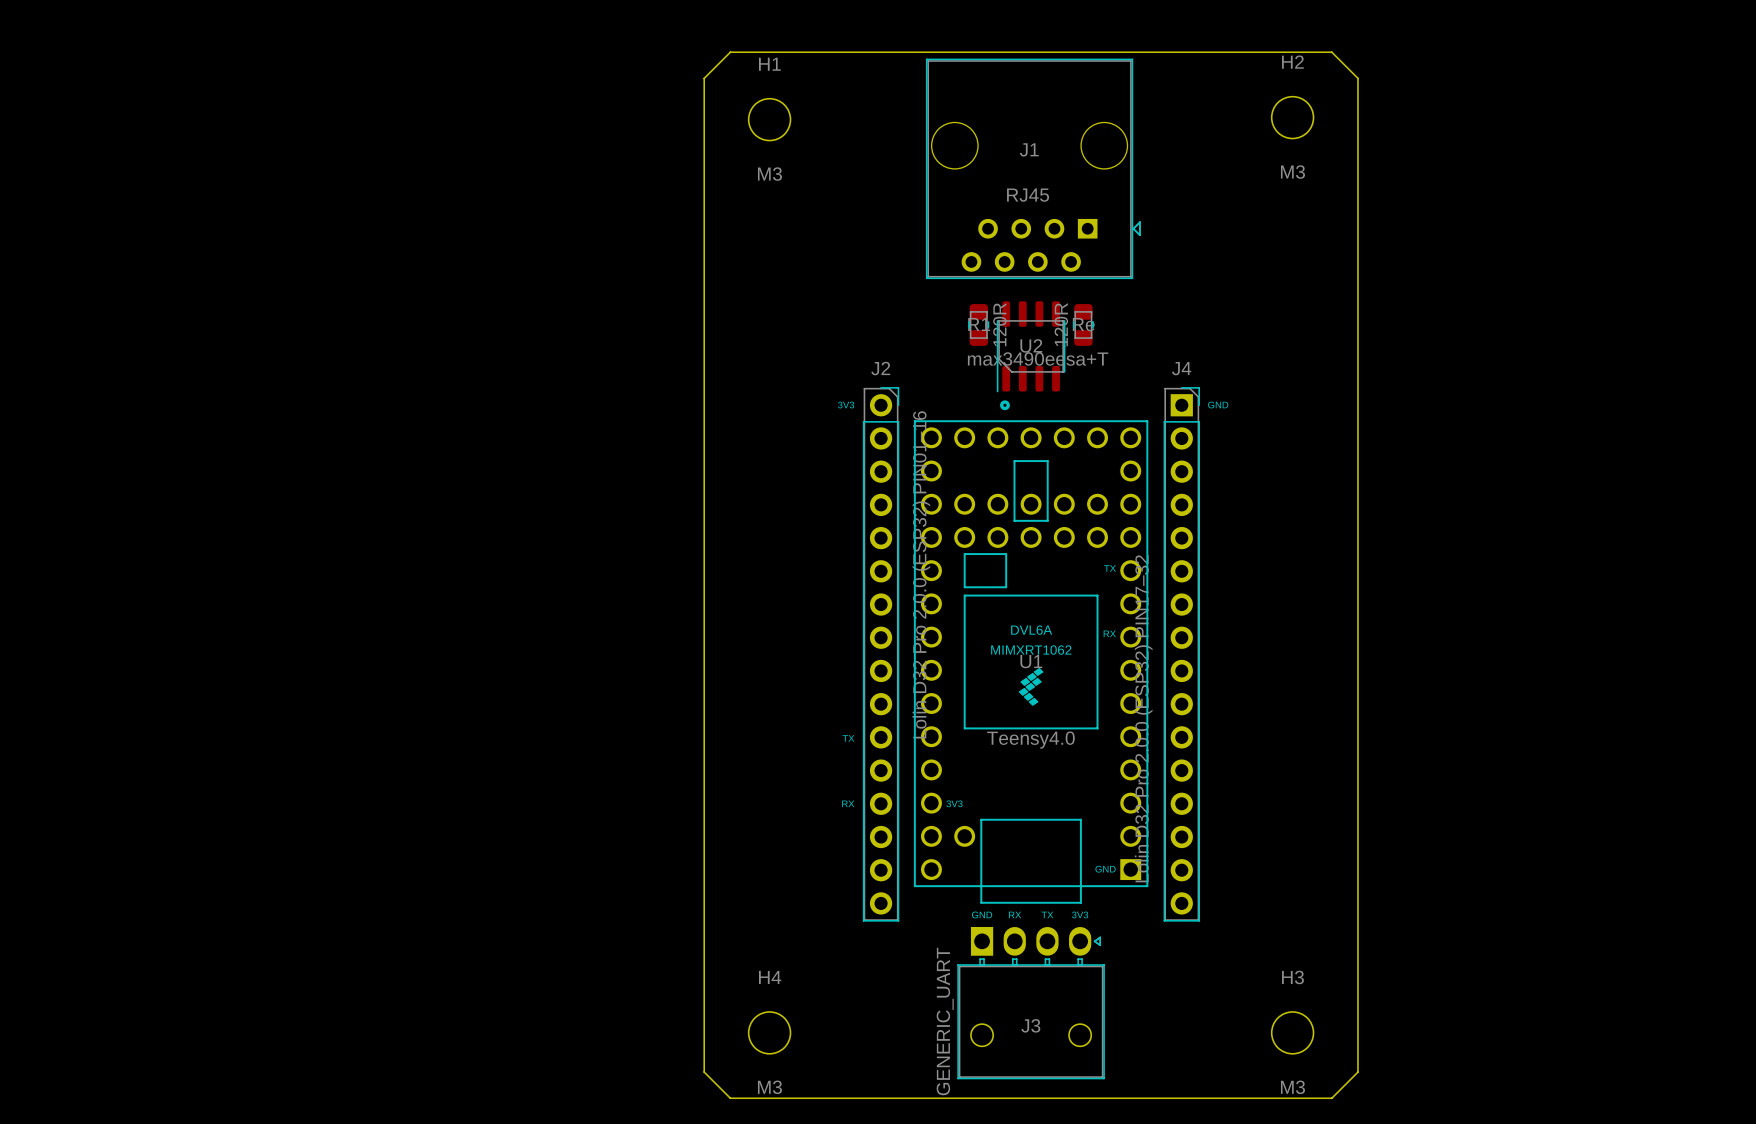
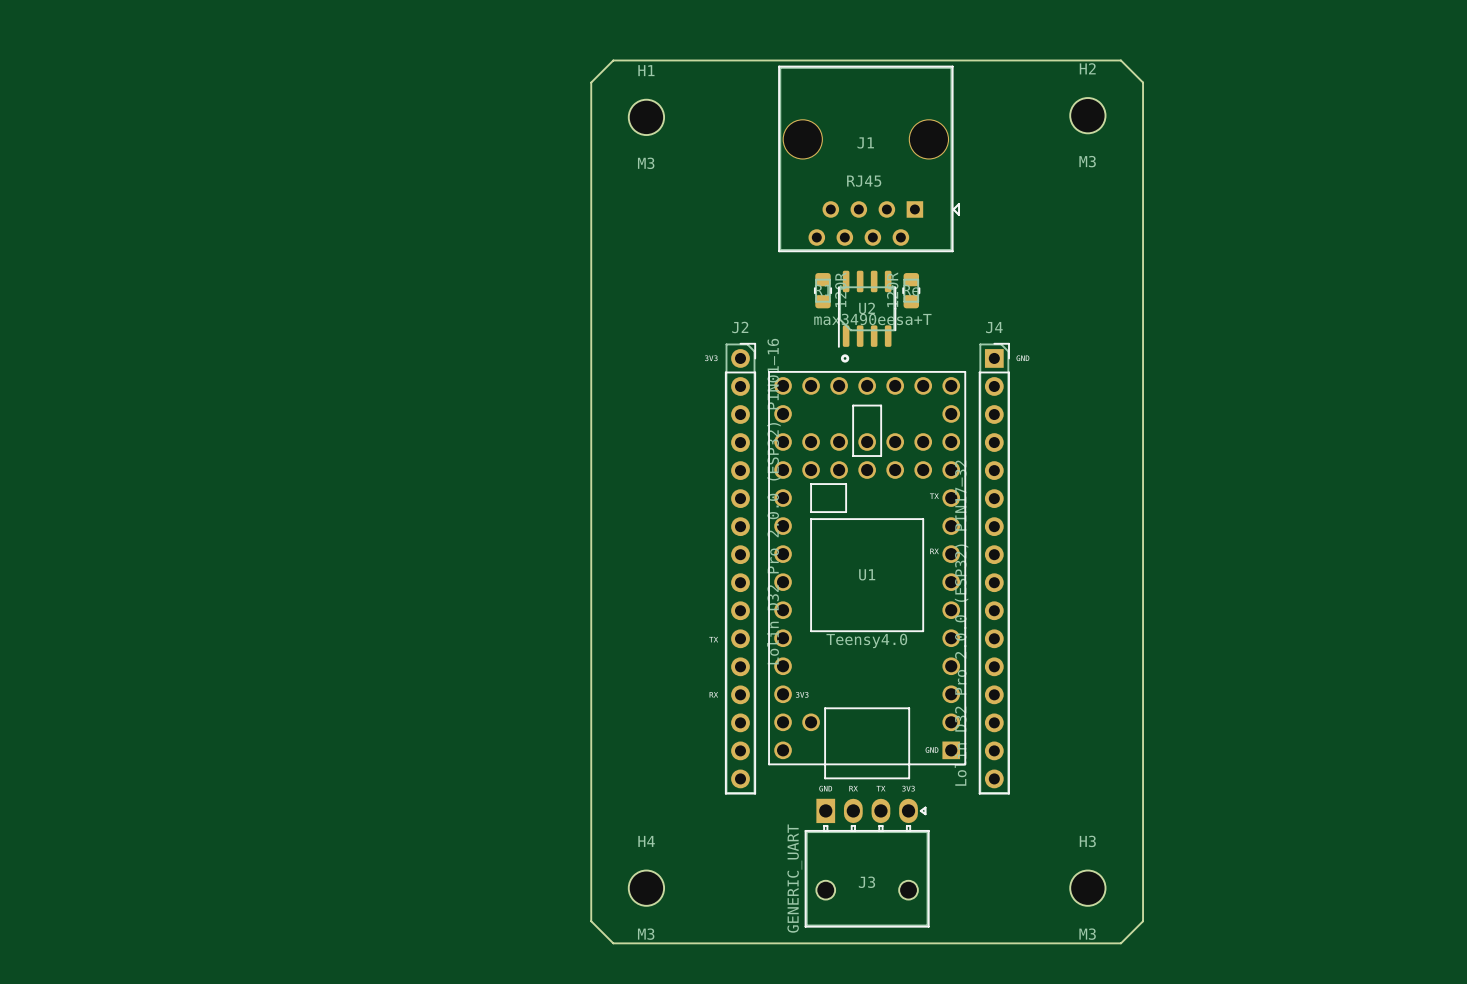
U1 footprint: [913, 420, 1149, 904] -> [768, 371, 967, 780]

